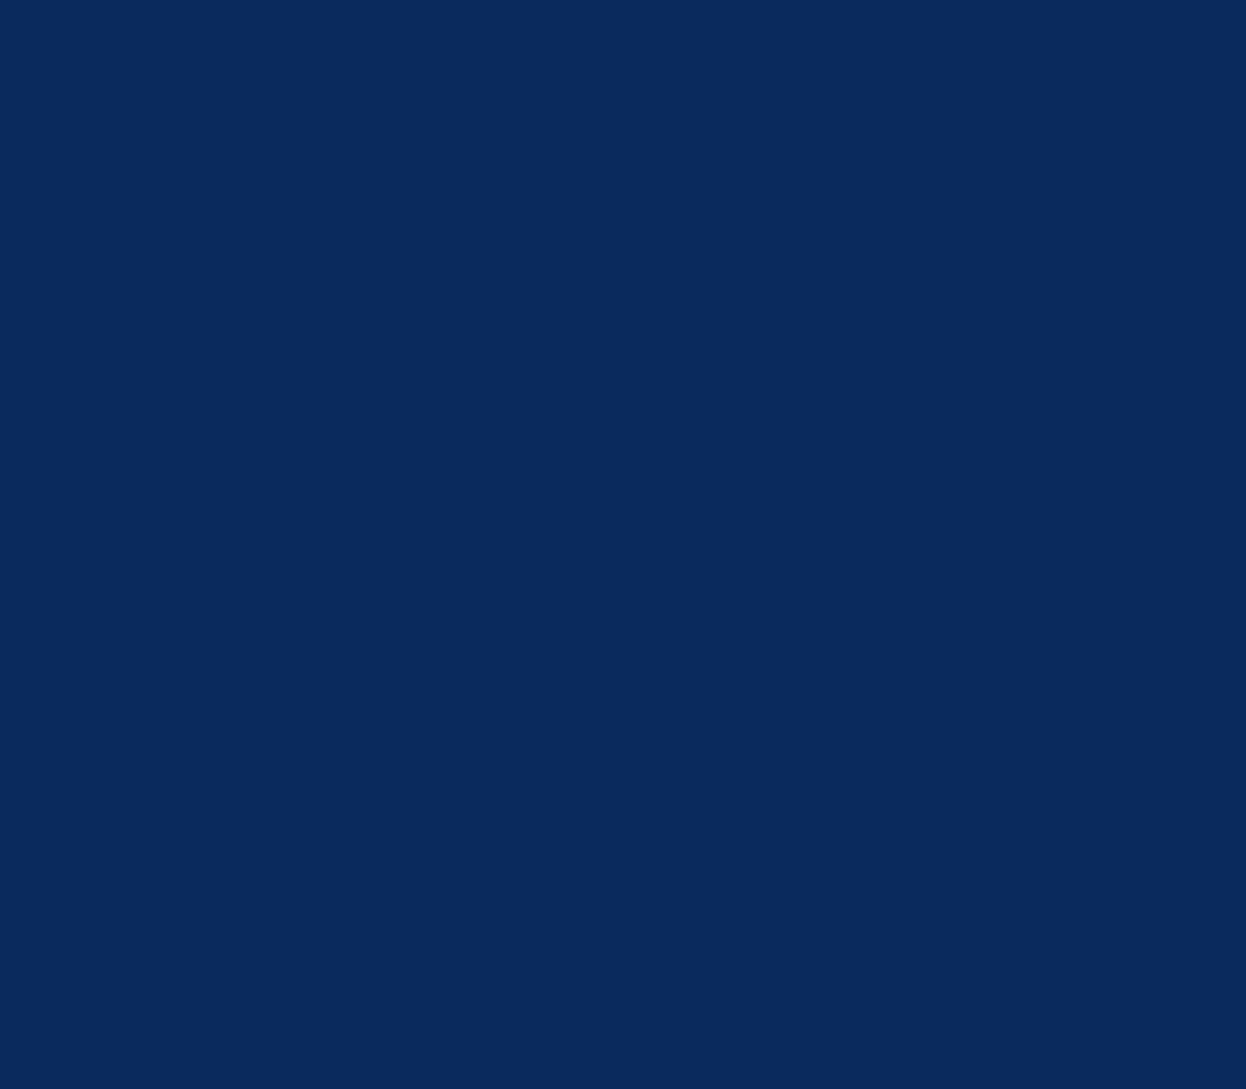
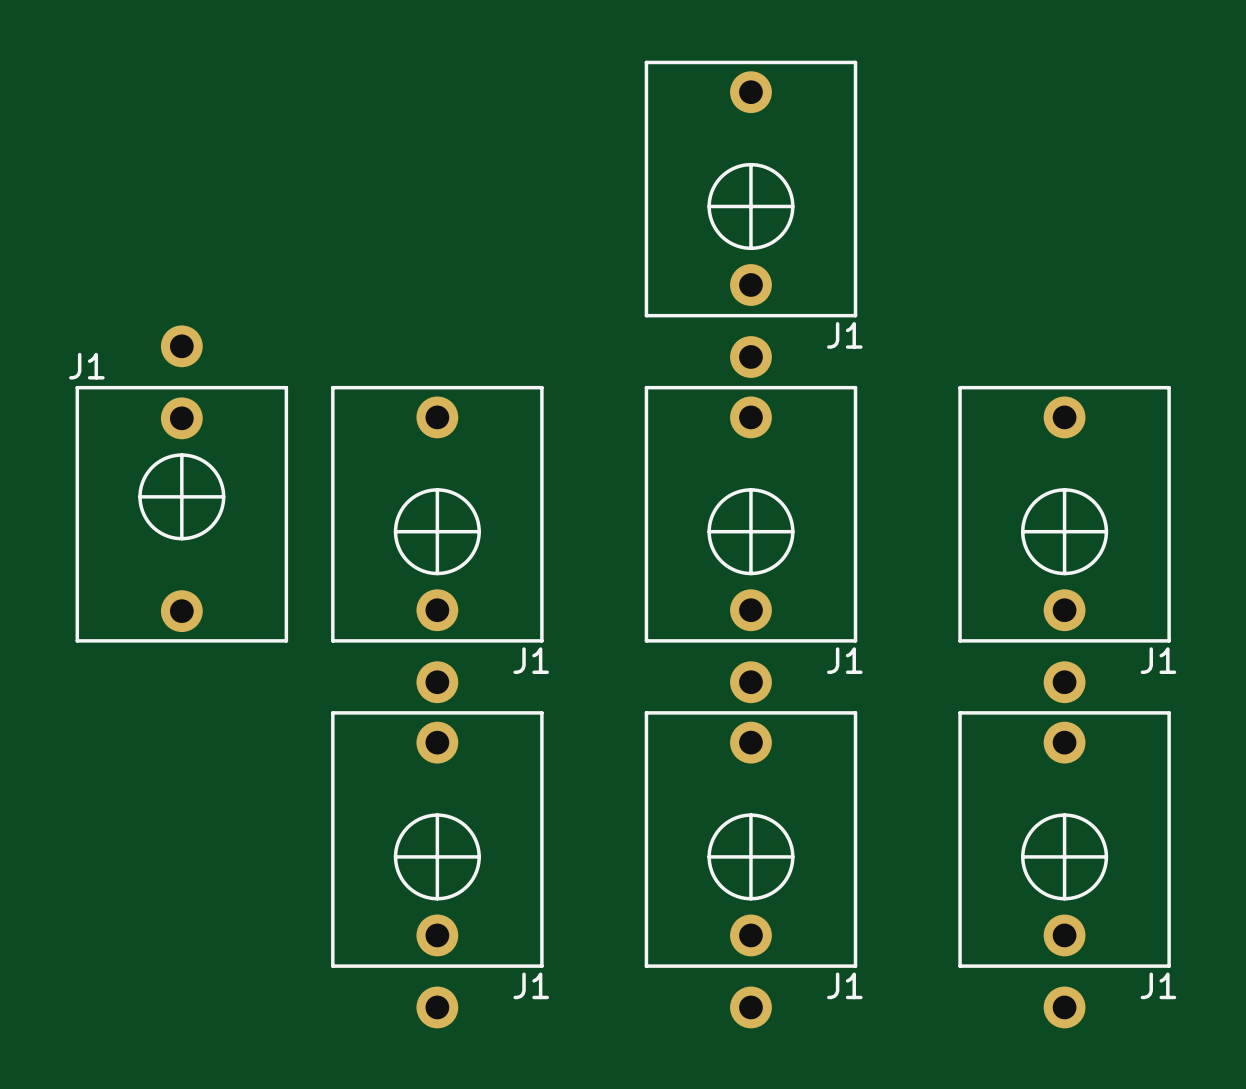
J1: none -> (750, 219)
J1: none -> (181, 484)
J1: none -> (437, 544)
J1: none -> (750, 544)
J1: none -> (1064, 544)
J1: none -> (437, 869)
J1: none -> (750, 869)
J1: none -> (1064, 869)

